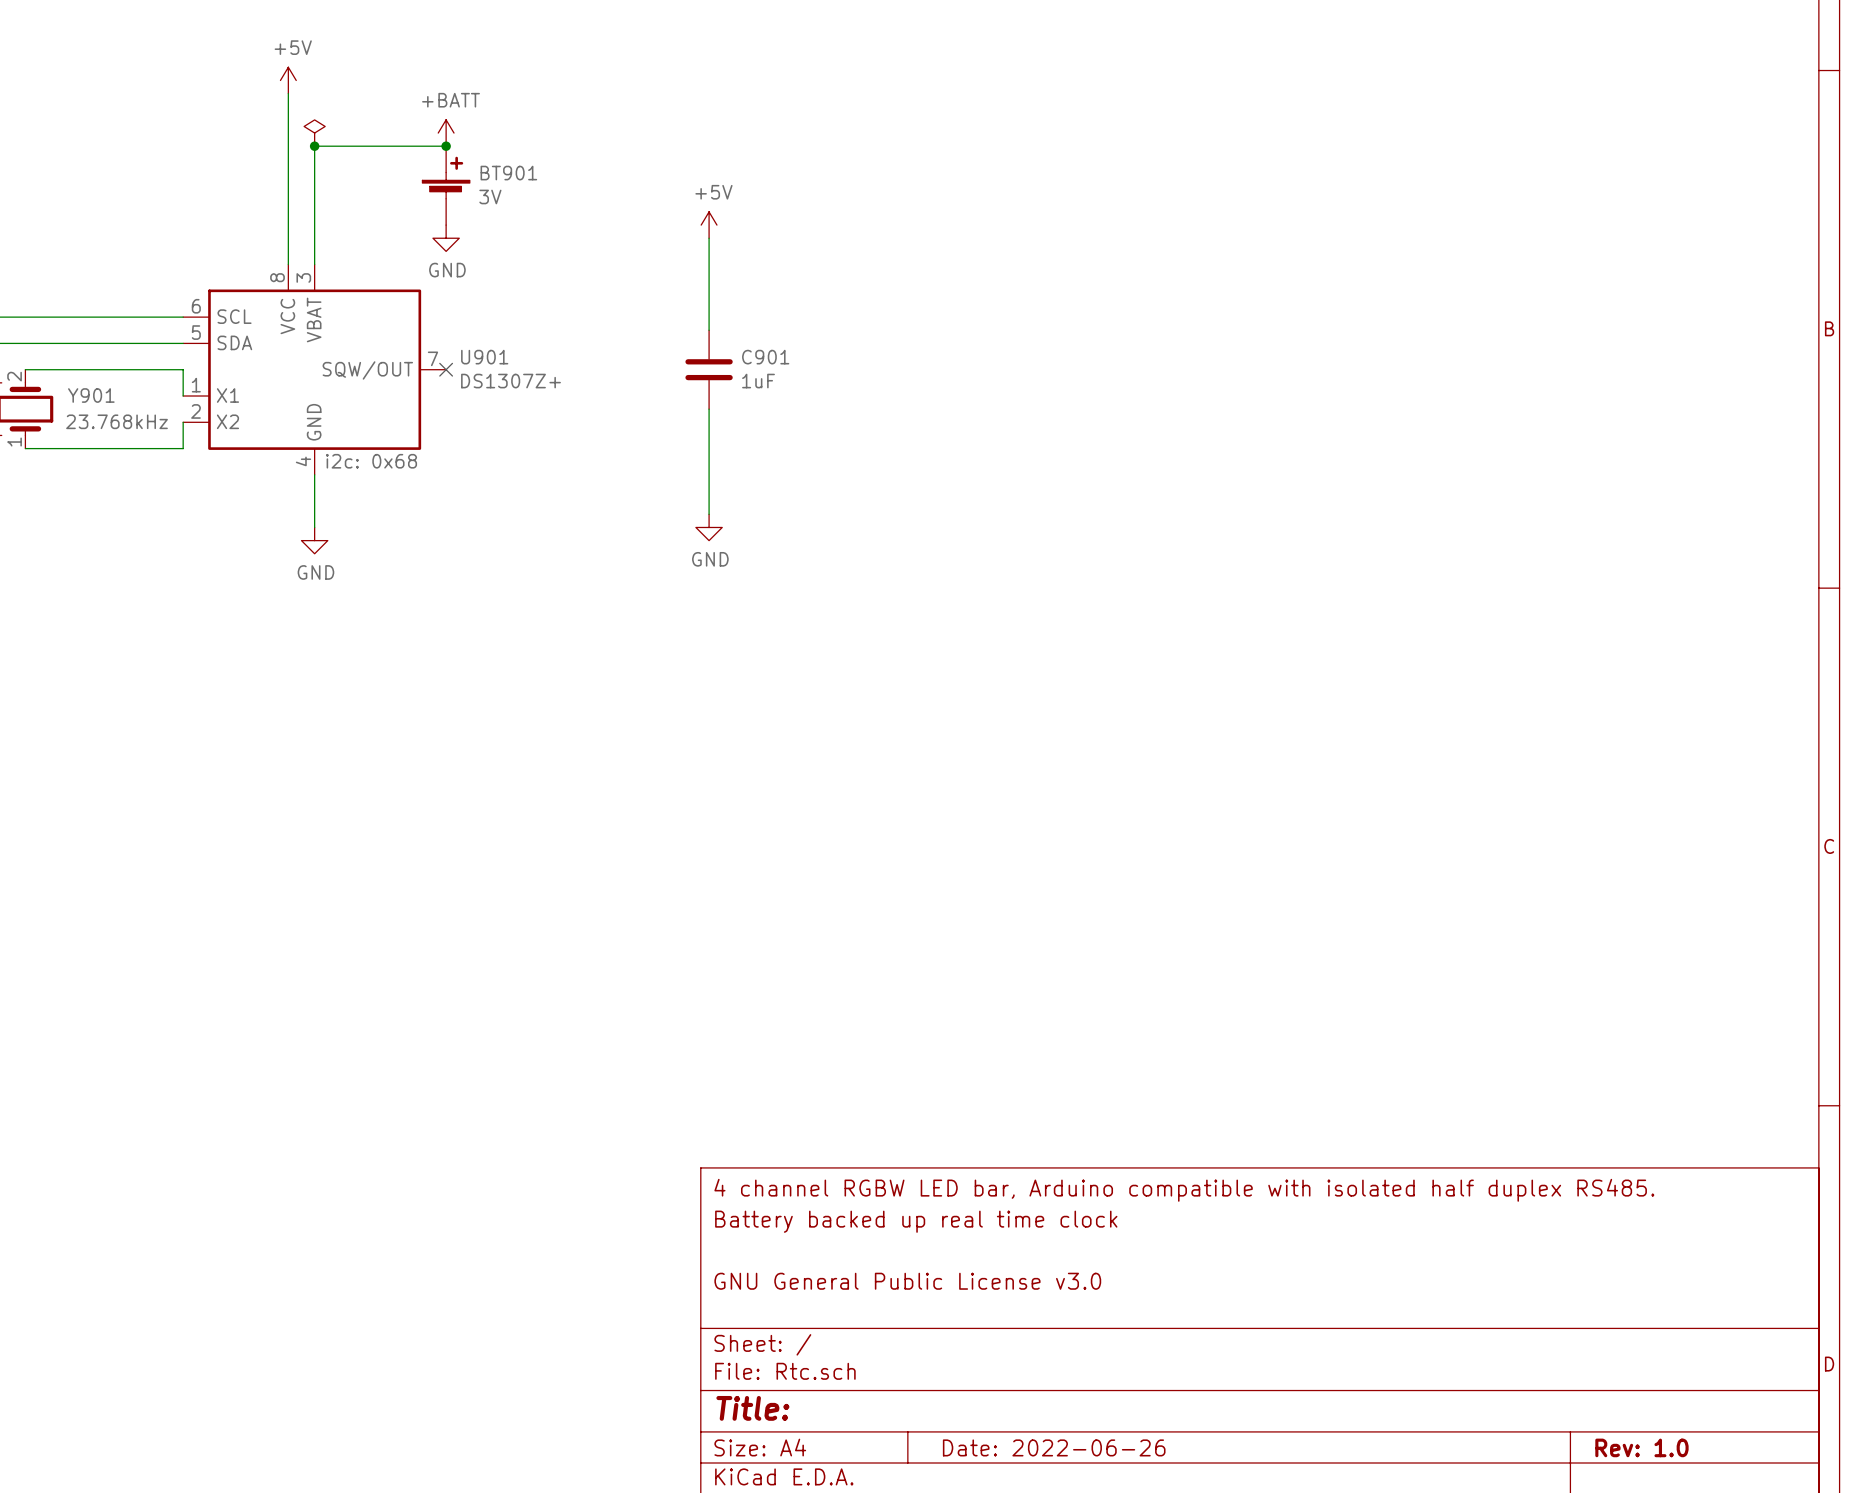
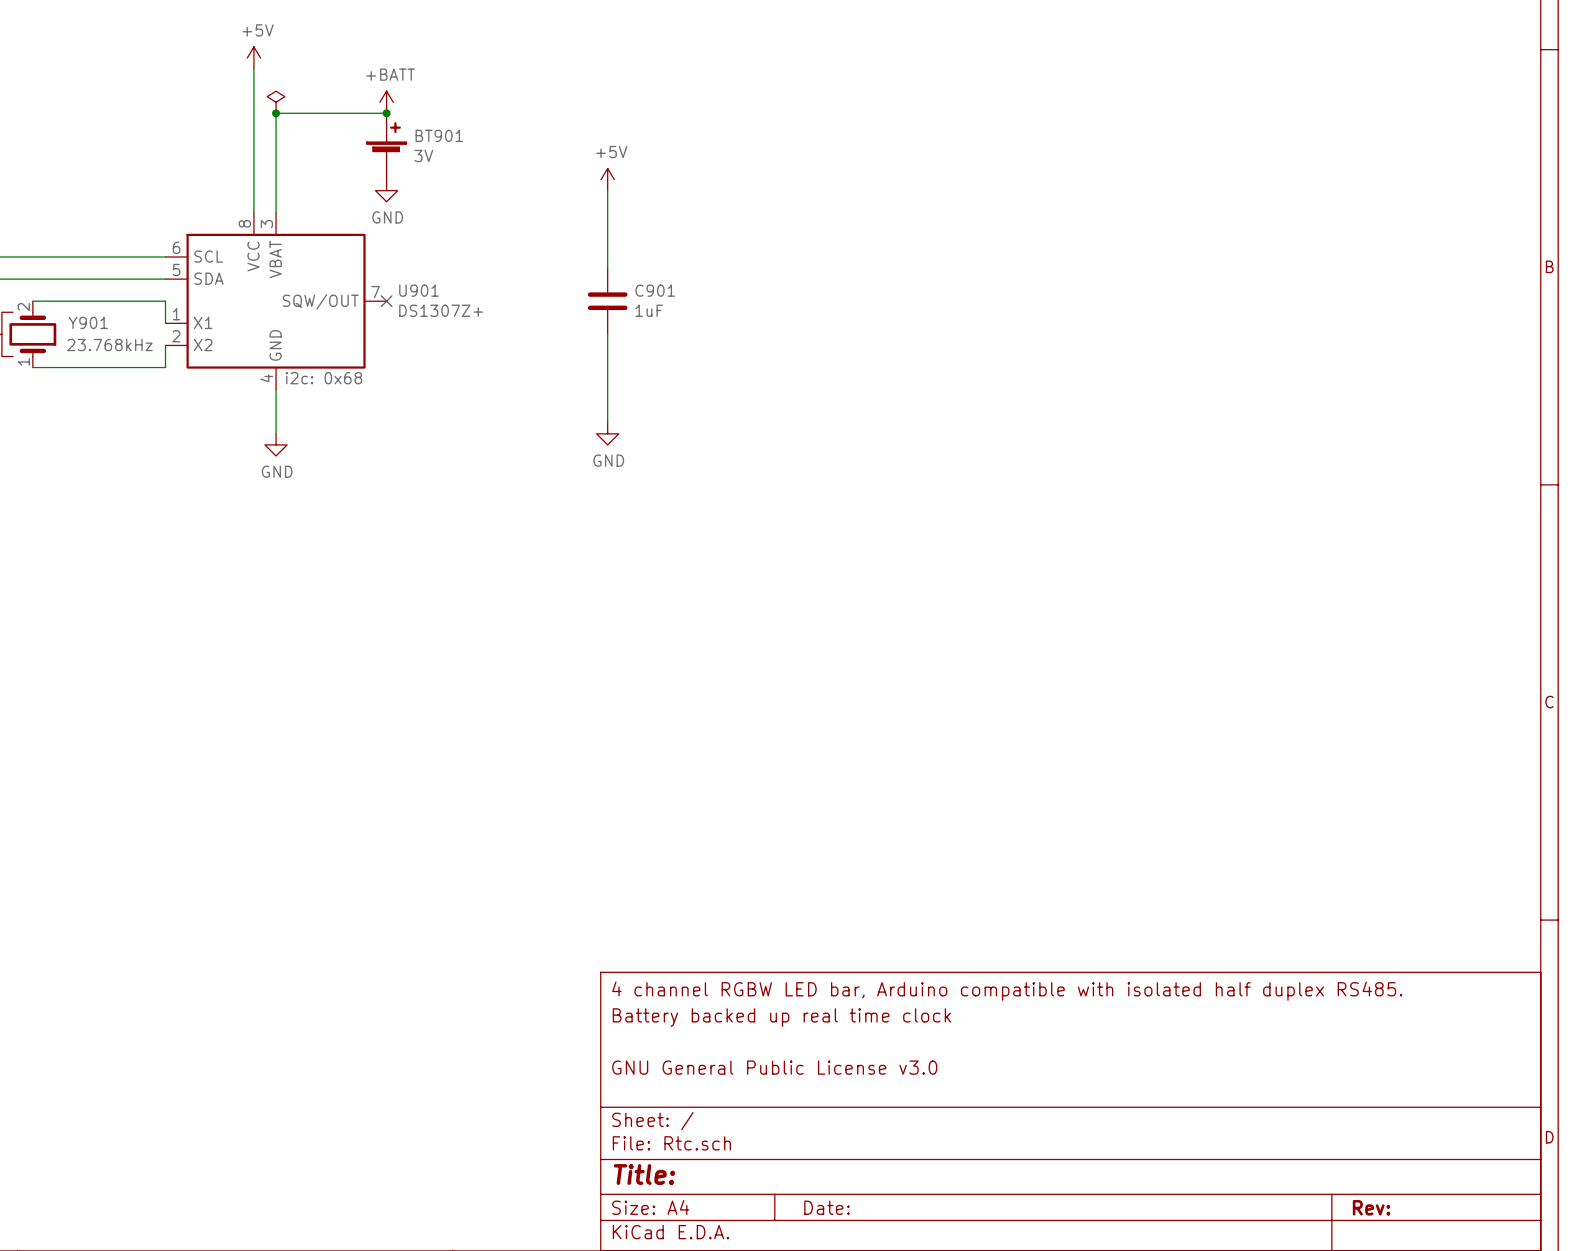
title block: Date: 2022-06-26 (1054, 1447) -> Date: (826, 1207)
title block: Rev: 1.0 (1641, 1447) -> Rev: (1371, 1207)

